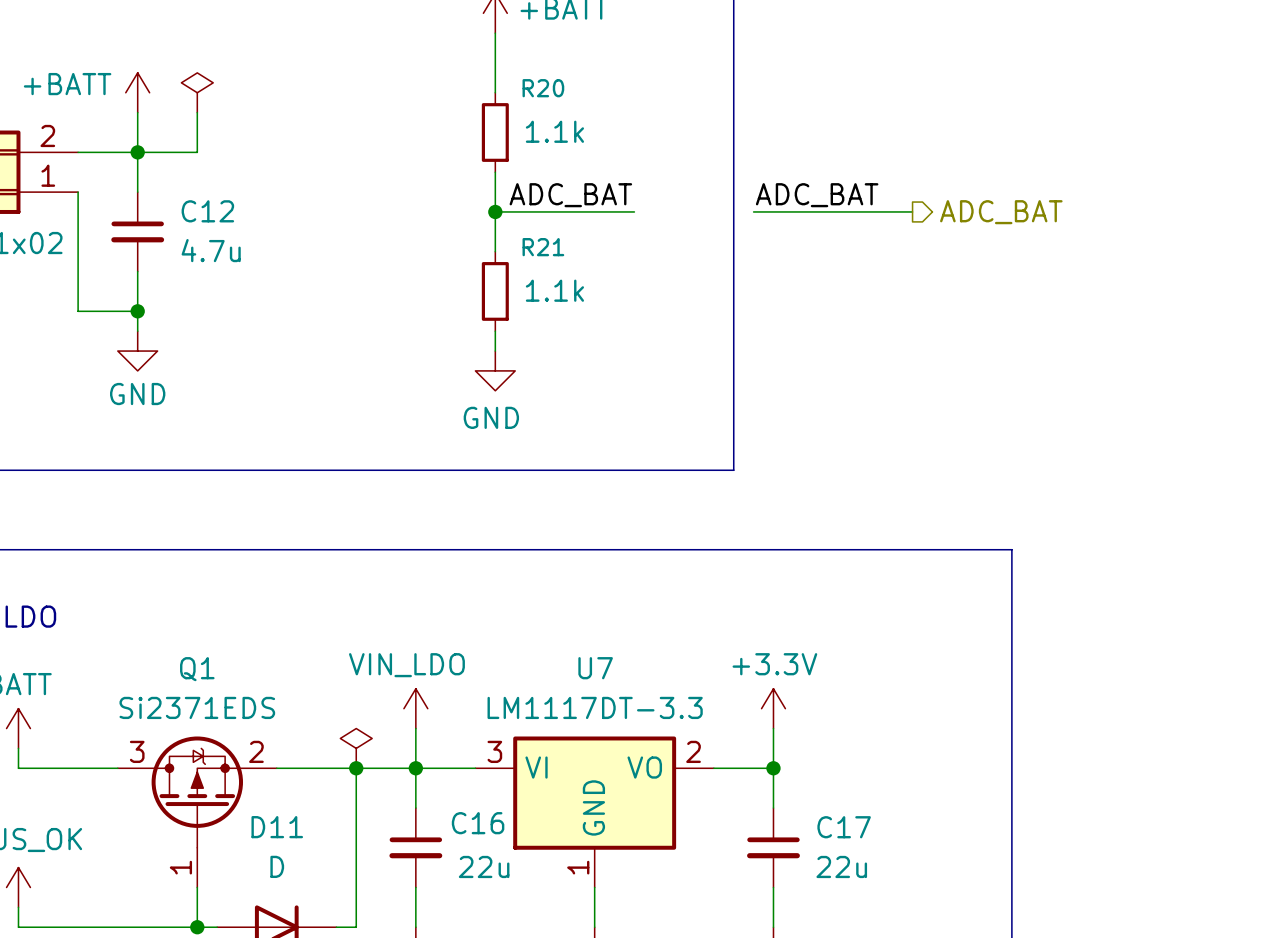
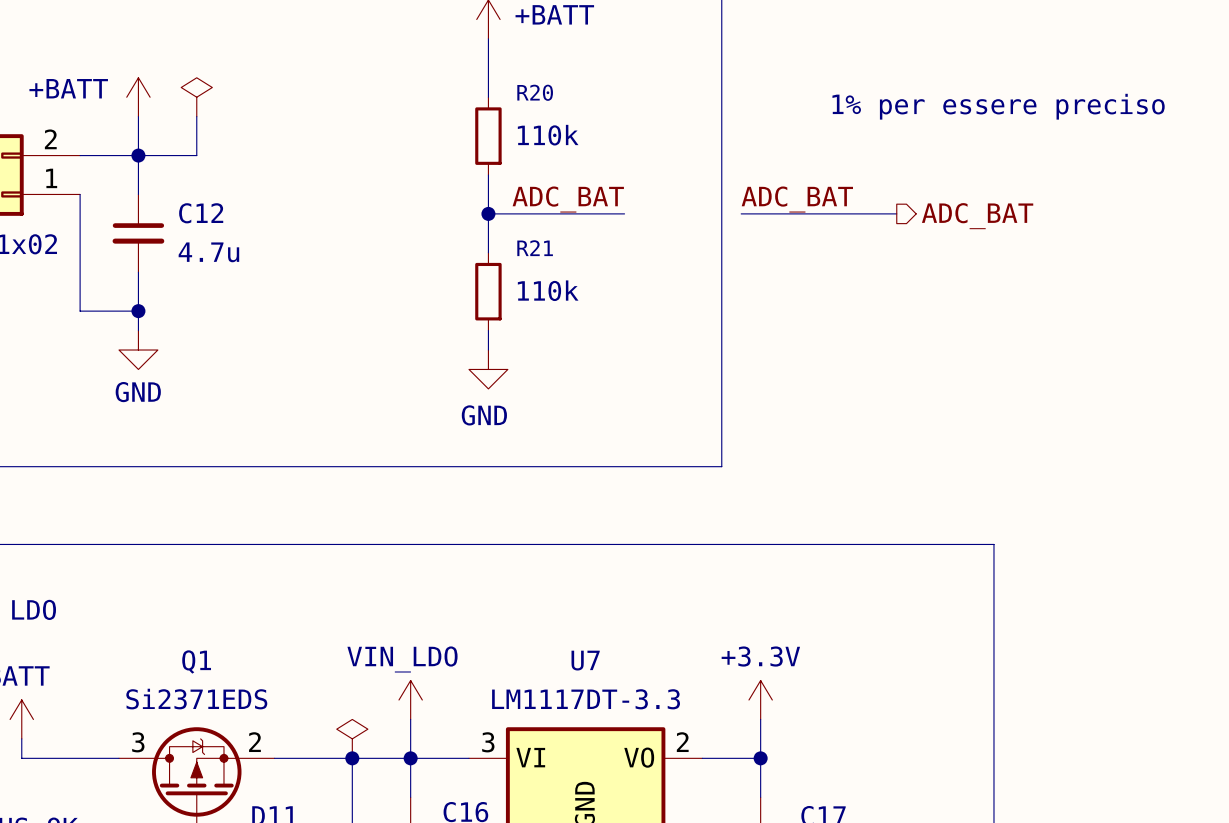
text: none -> 1% per essere preciso (998, 106)
R20 value: 1.1k (554, 131) -> 110k (548, 135)
R21 value: 1.1k (554, 290) -> 110k (548, 290)

